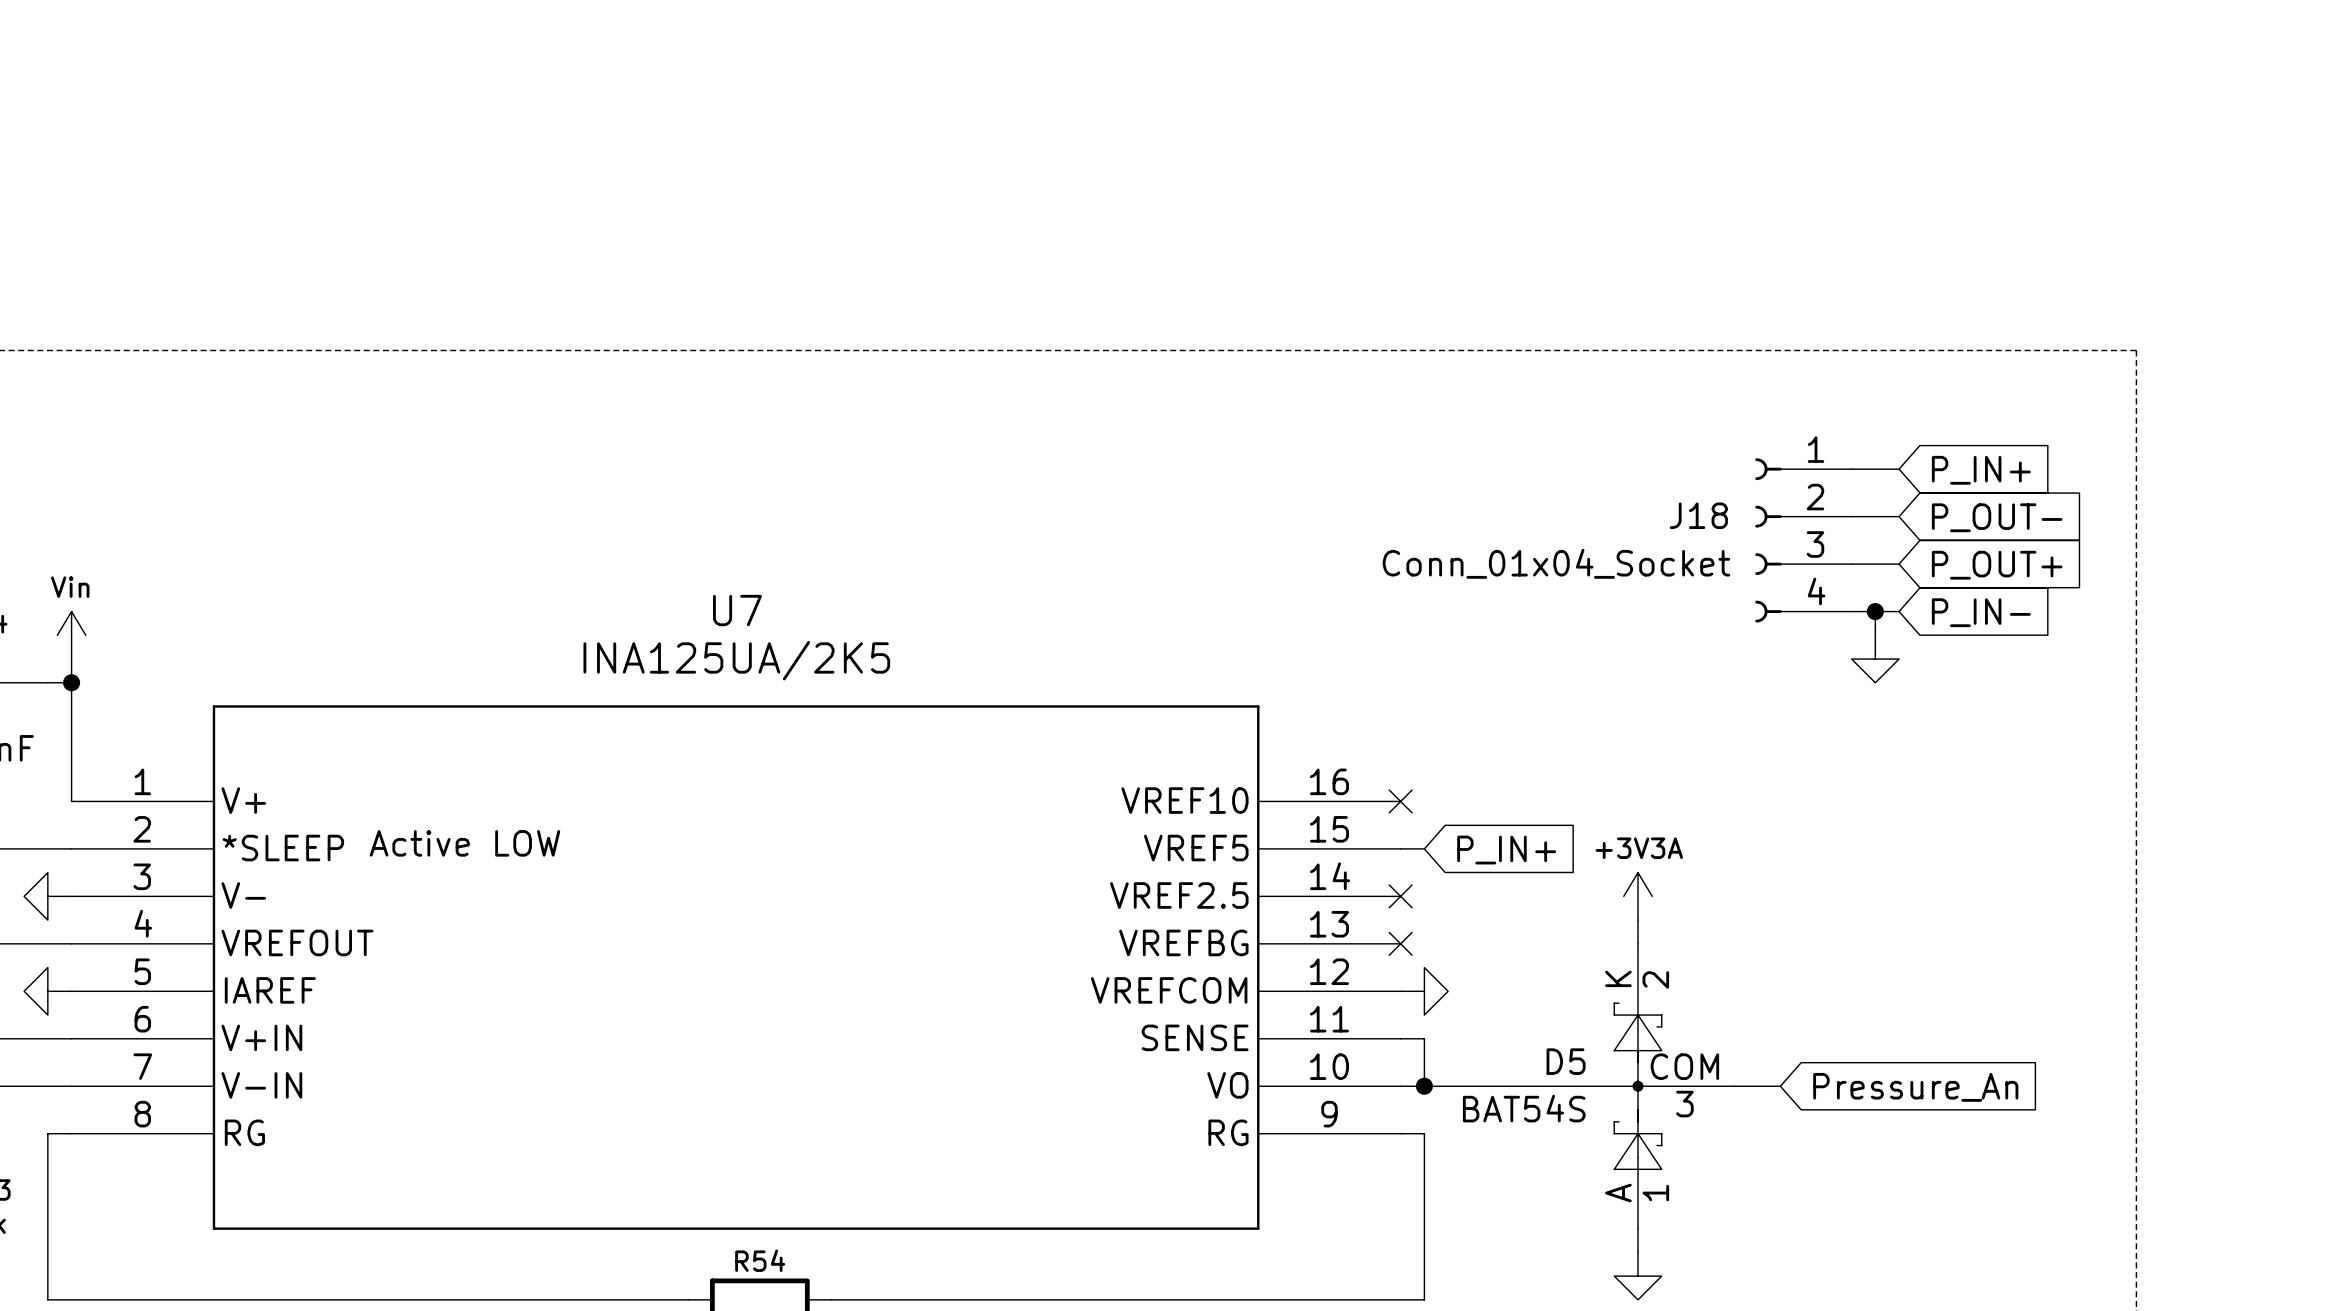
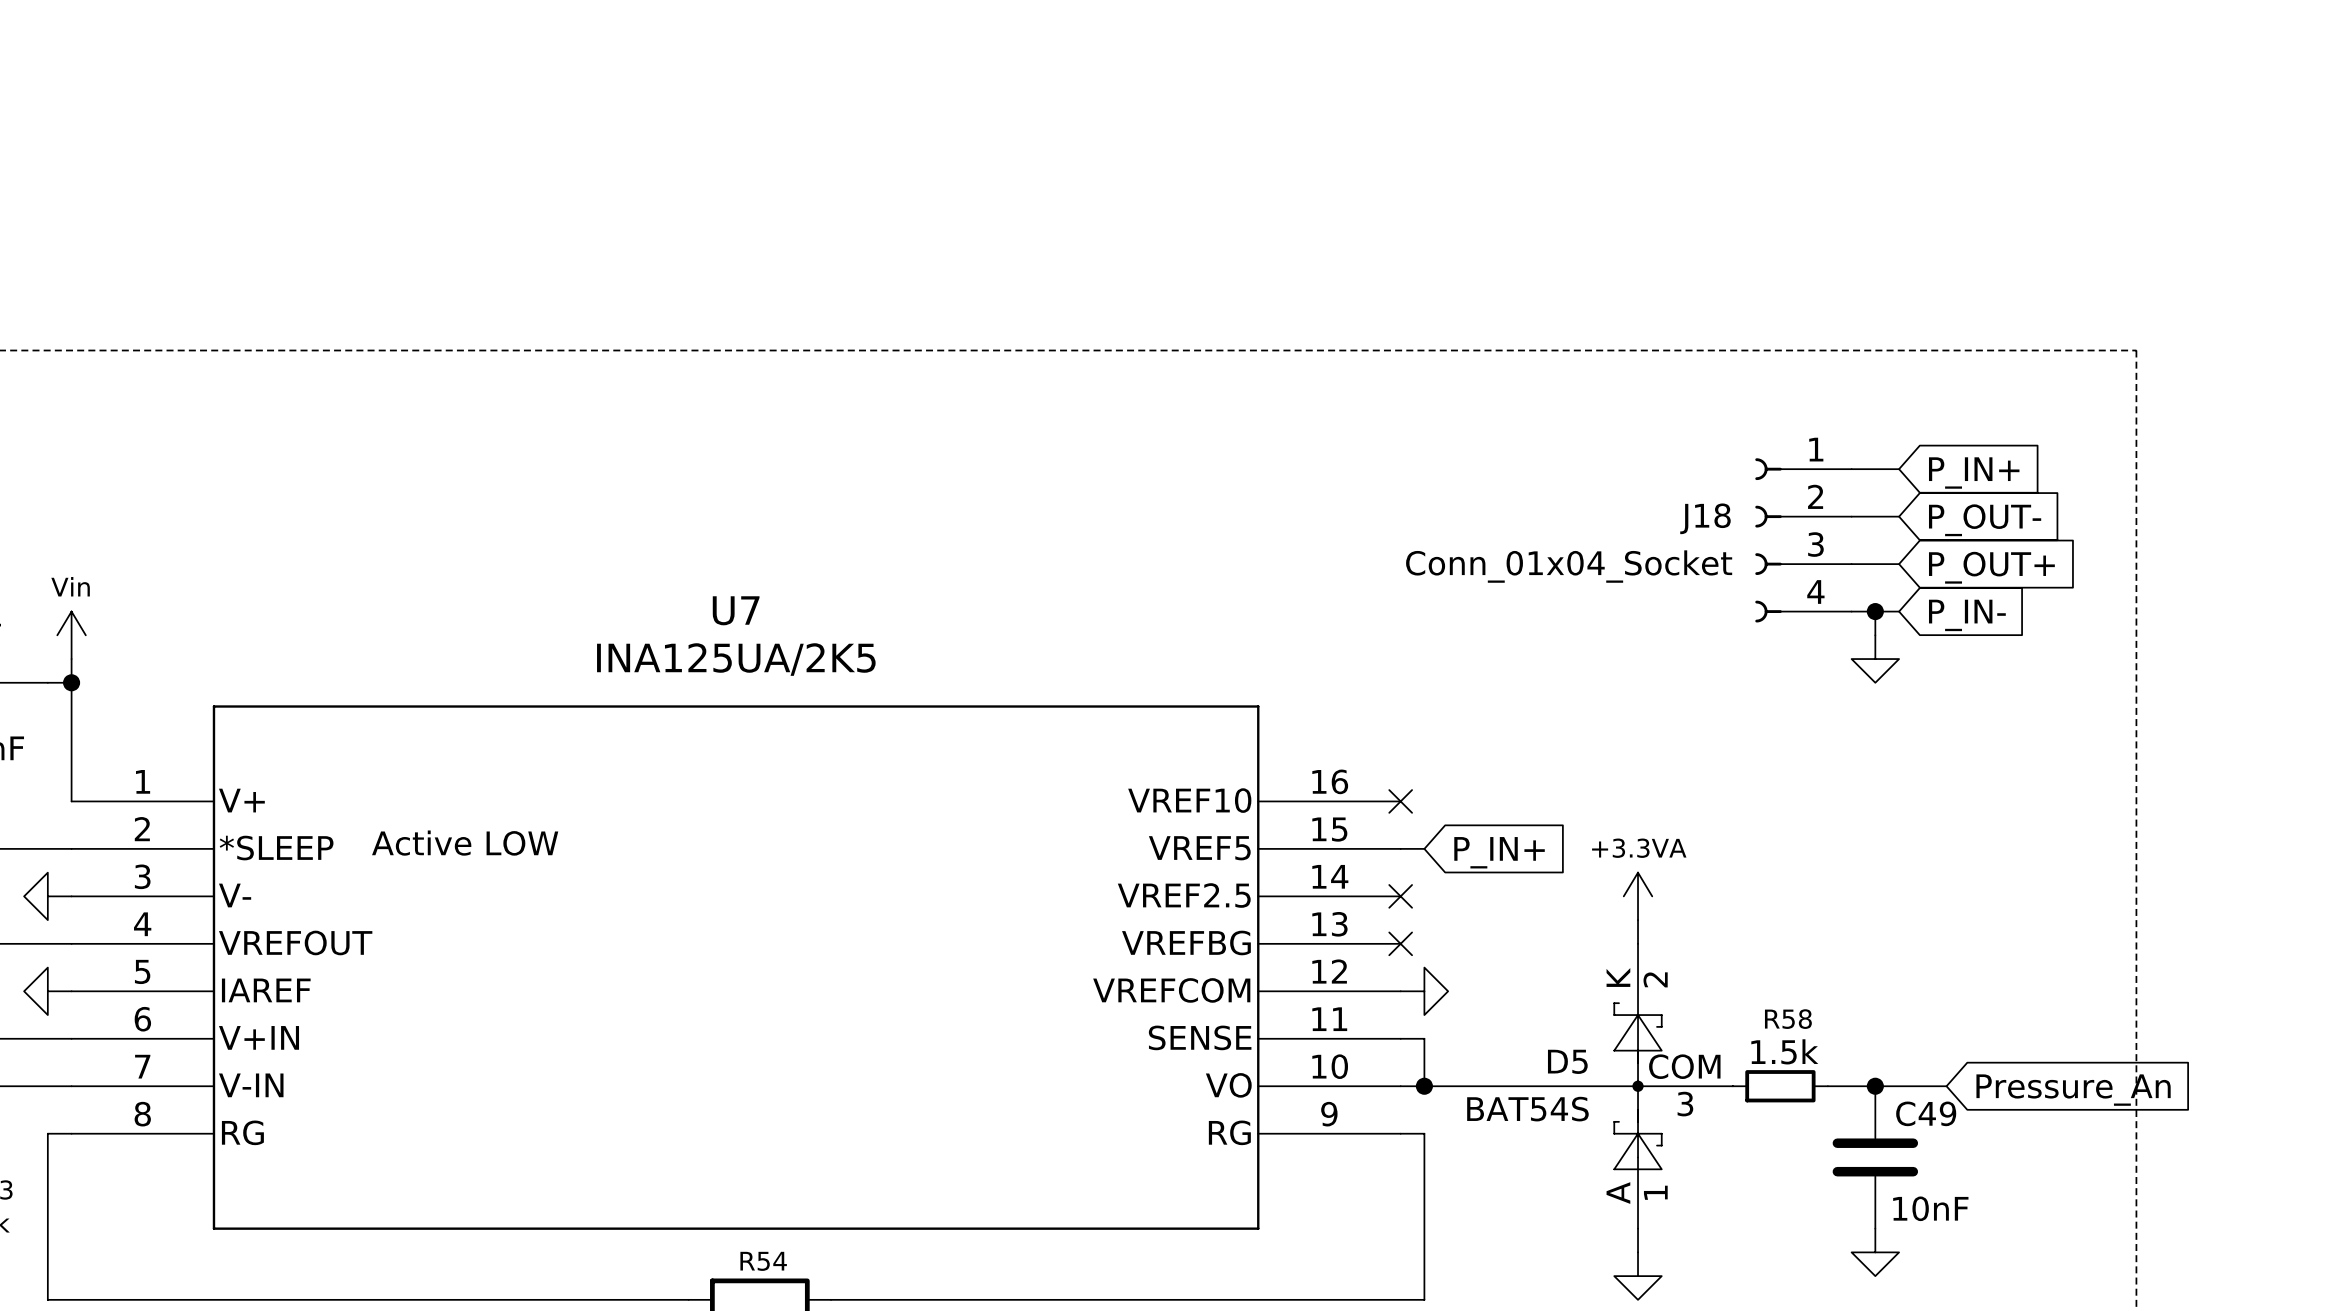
power symbol: +3V3A (1638, 896) -> +3.3VA (1638, 896)
wire: (1732, 1086) (1780, 1086) -> none
R58: none -> 1.5k (1780, 1086)
wire: none -> (1827, 1086) (1946, 1086)
junction: none -> (1875, 1086)
global label position: Pressure_An (1915, 1087) -> Pressure_An (2073, 1090)
C49: none -> 10nF (1875, 1157)
power symbol: none -> (1875, 1252)

